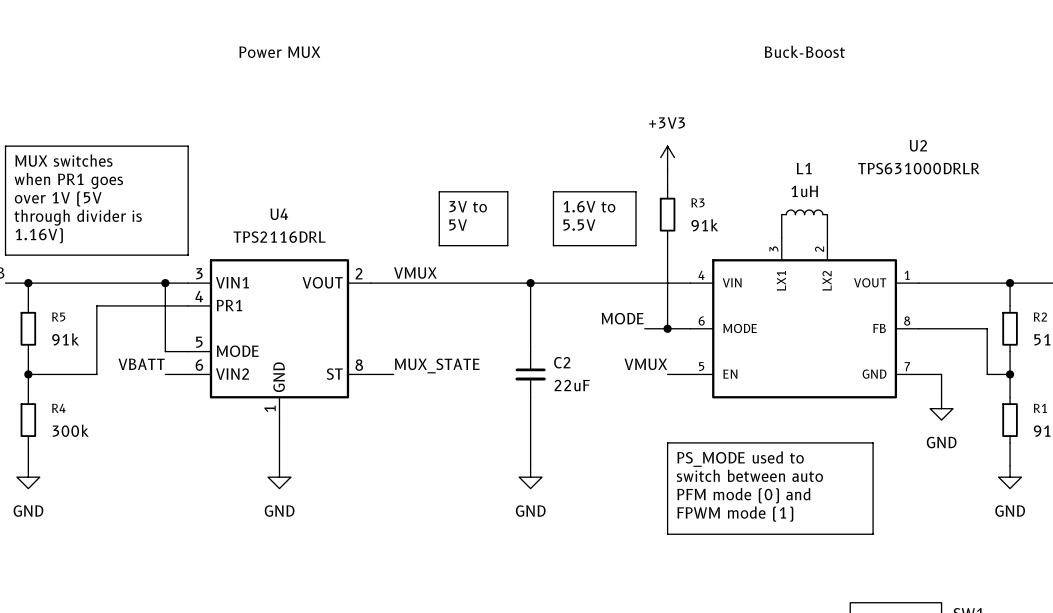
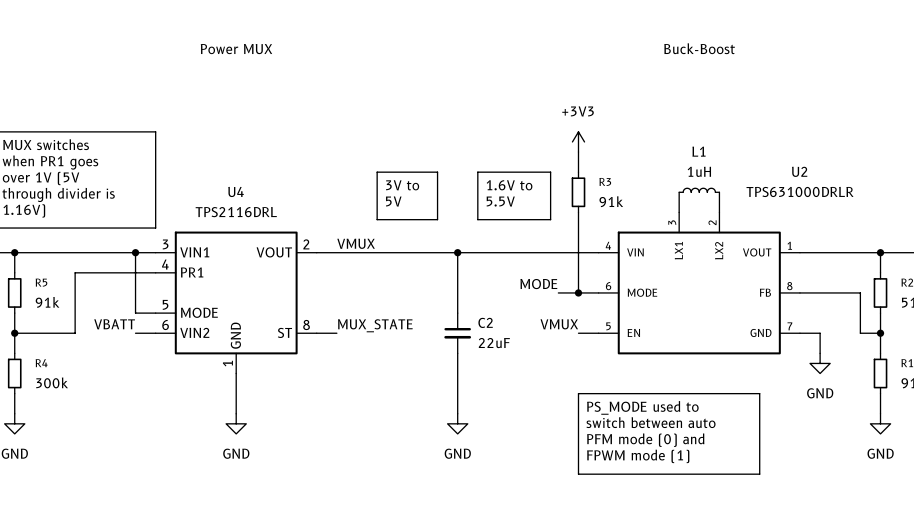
U2 name position: U2 (918, 145) -> U2 (799, 171)
U2 value position: TPS631000DRLR (918, 168) -> TPS631000DRLR (800, 191)

